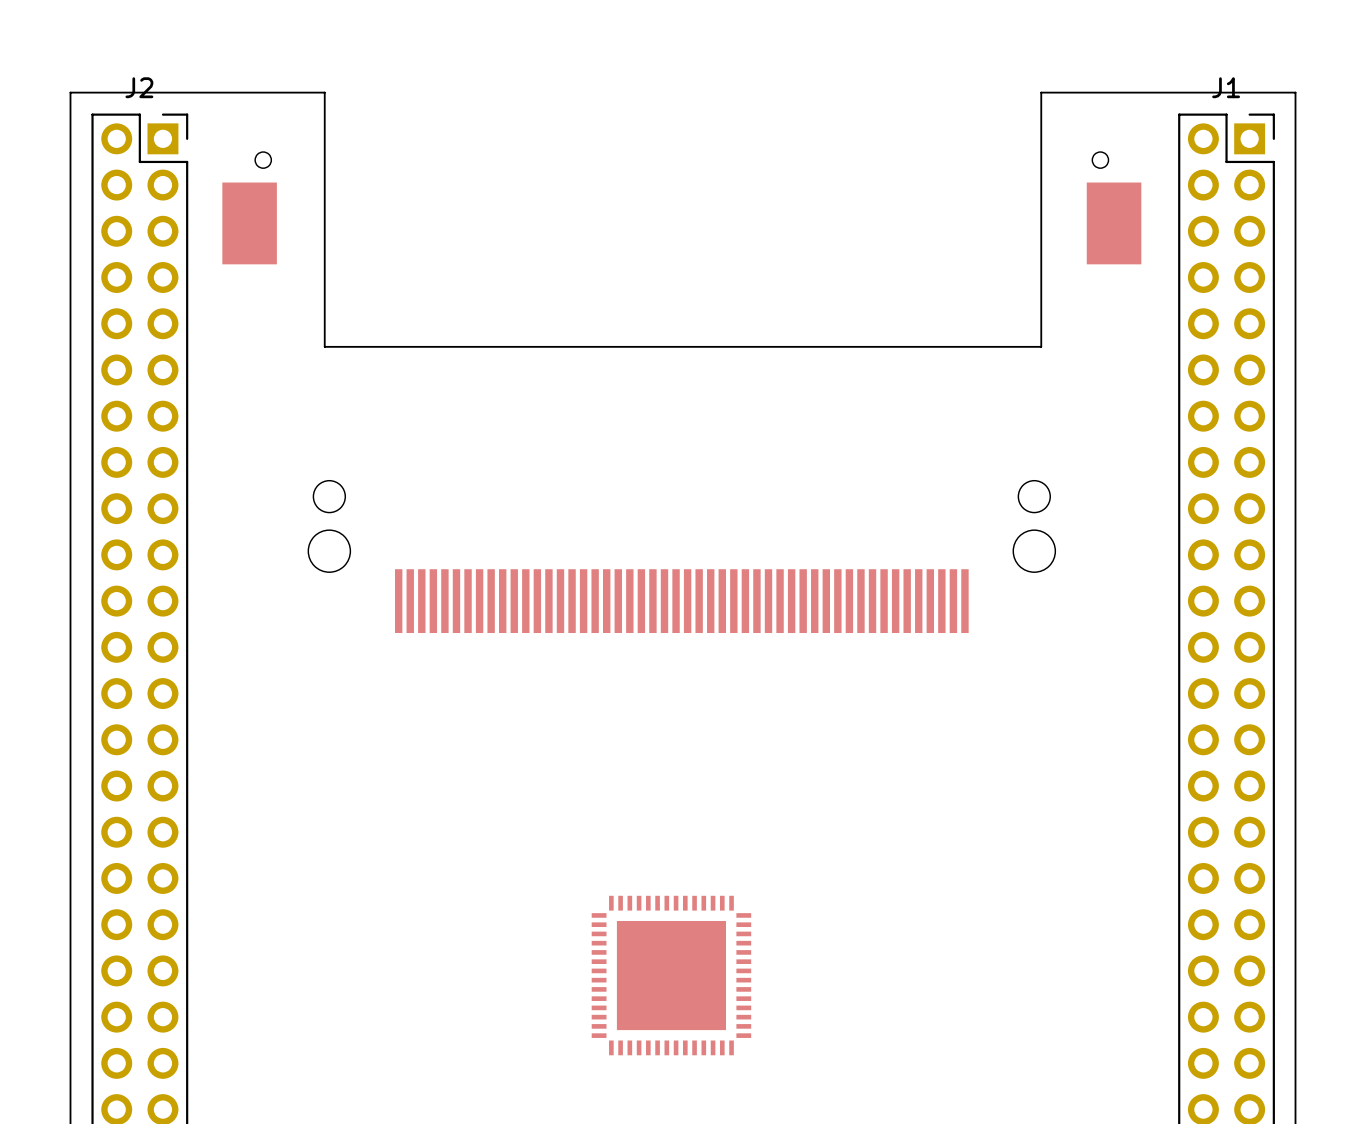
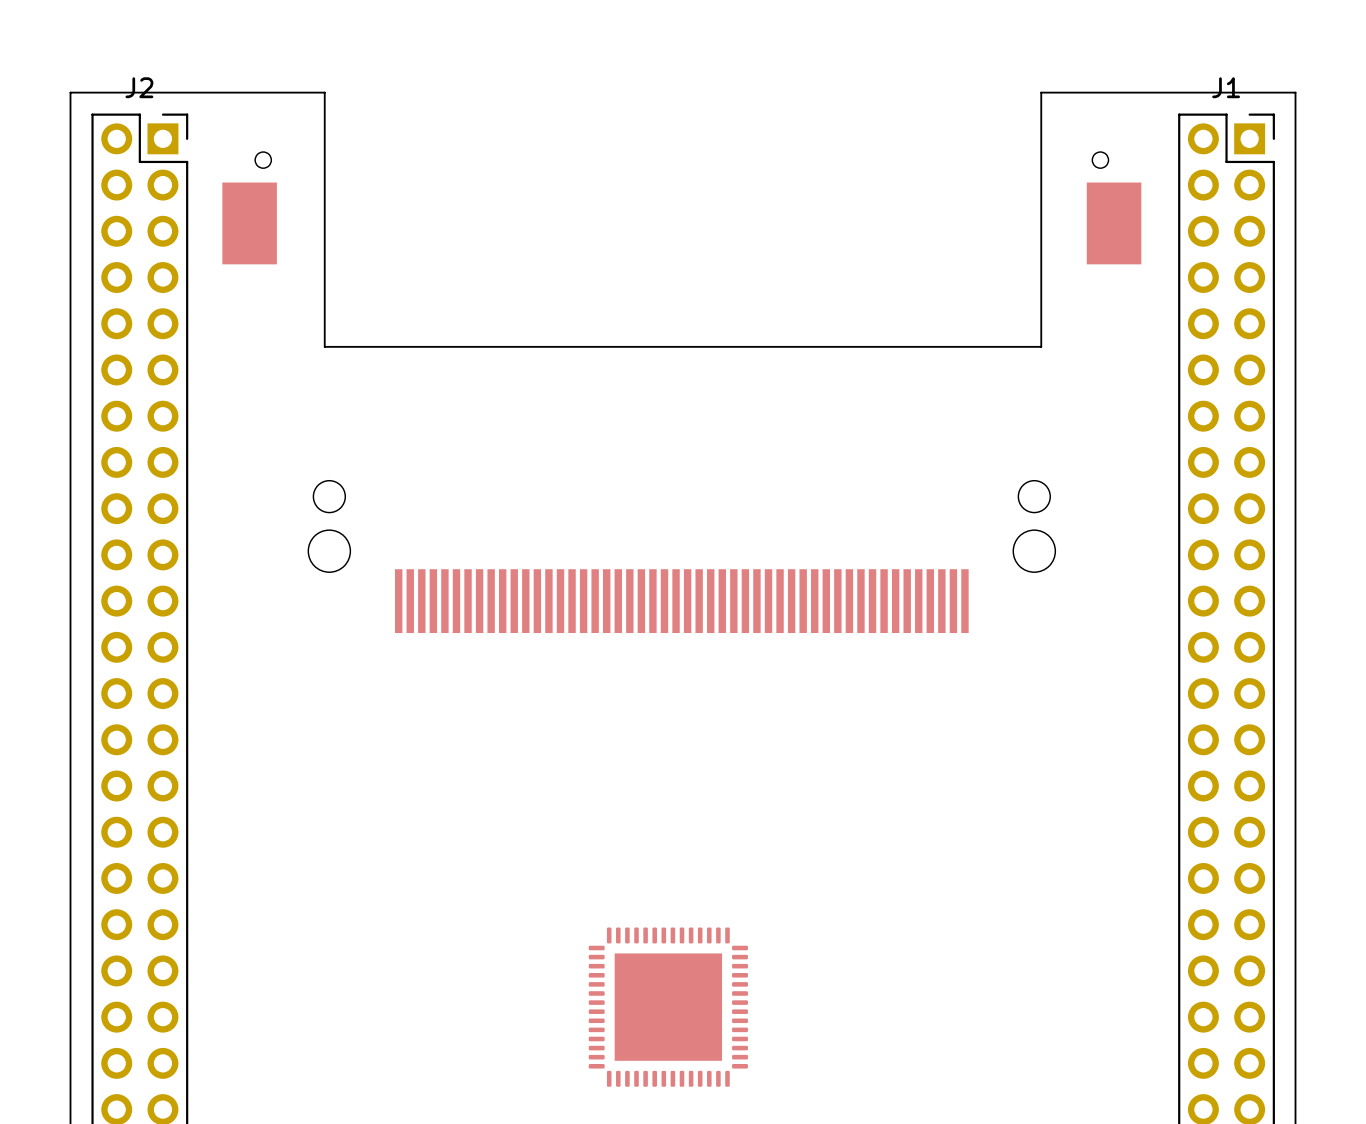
part: (671, 975) -> none
part: none -> (668, 1007)

